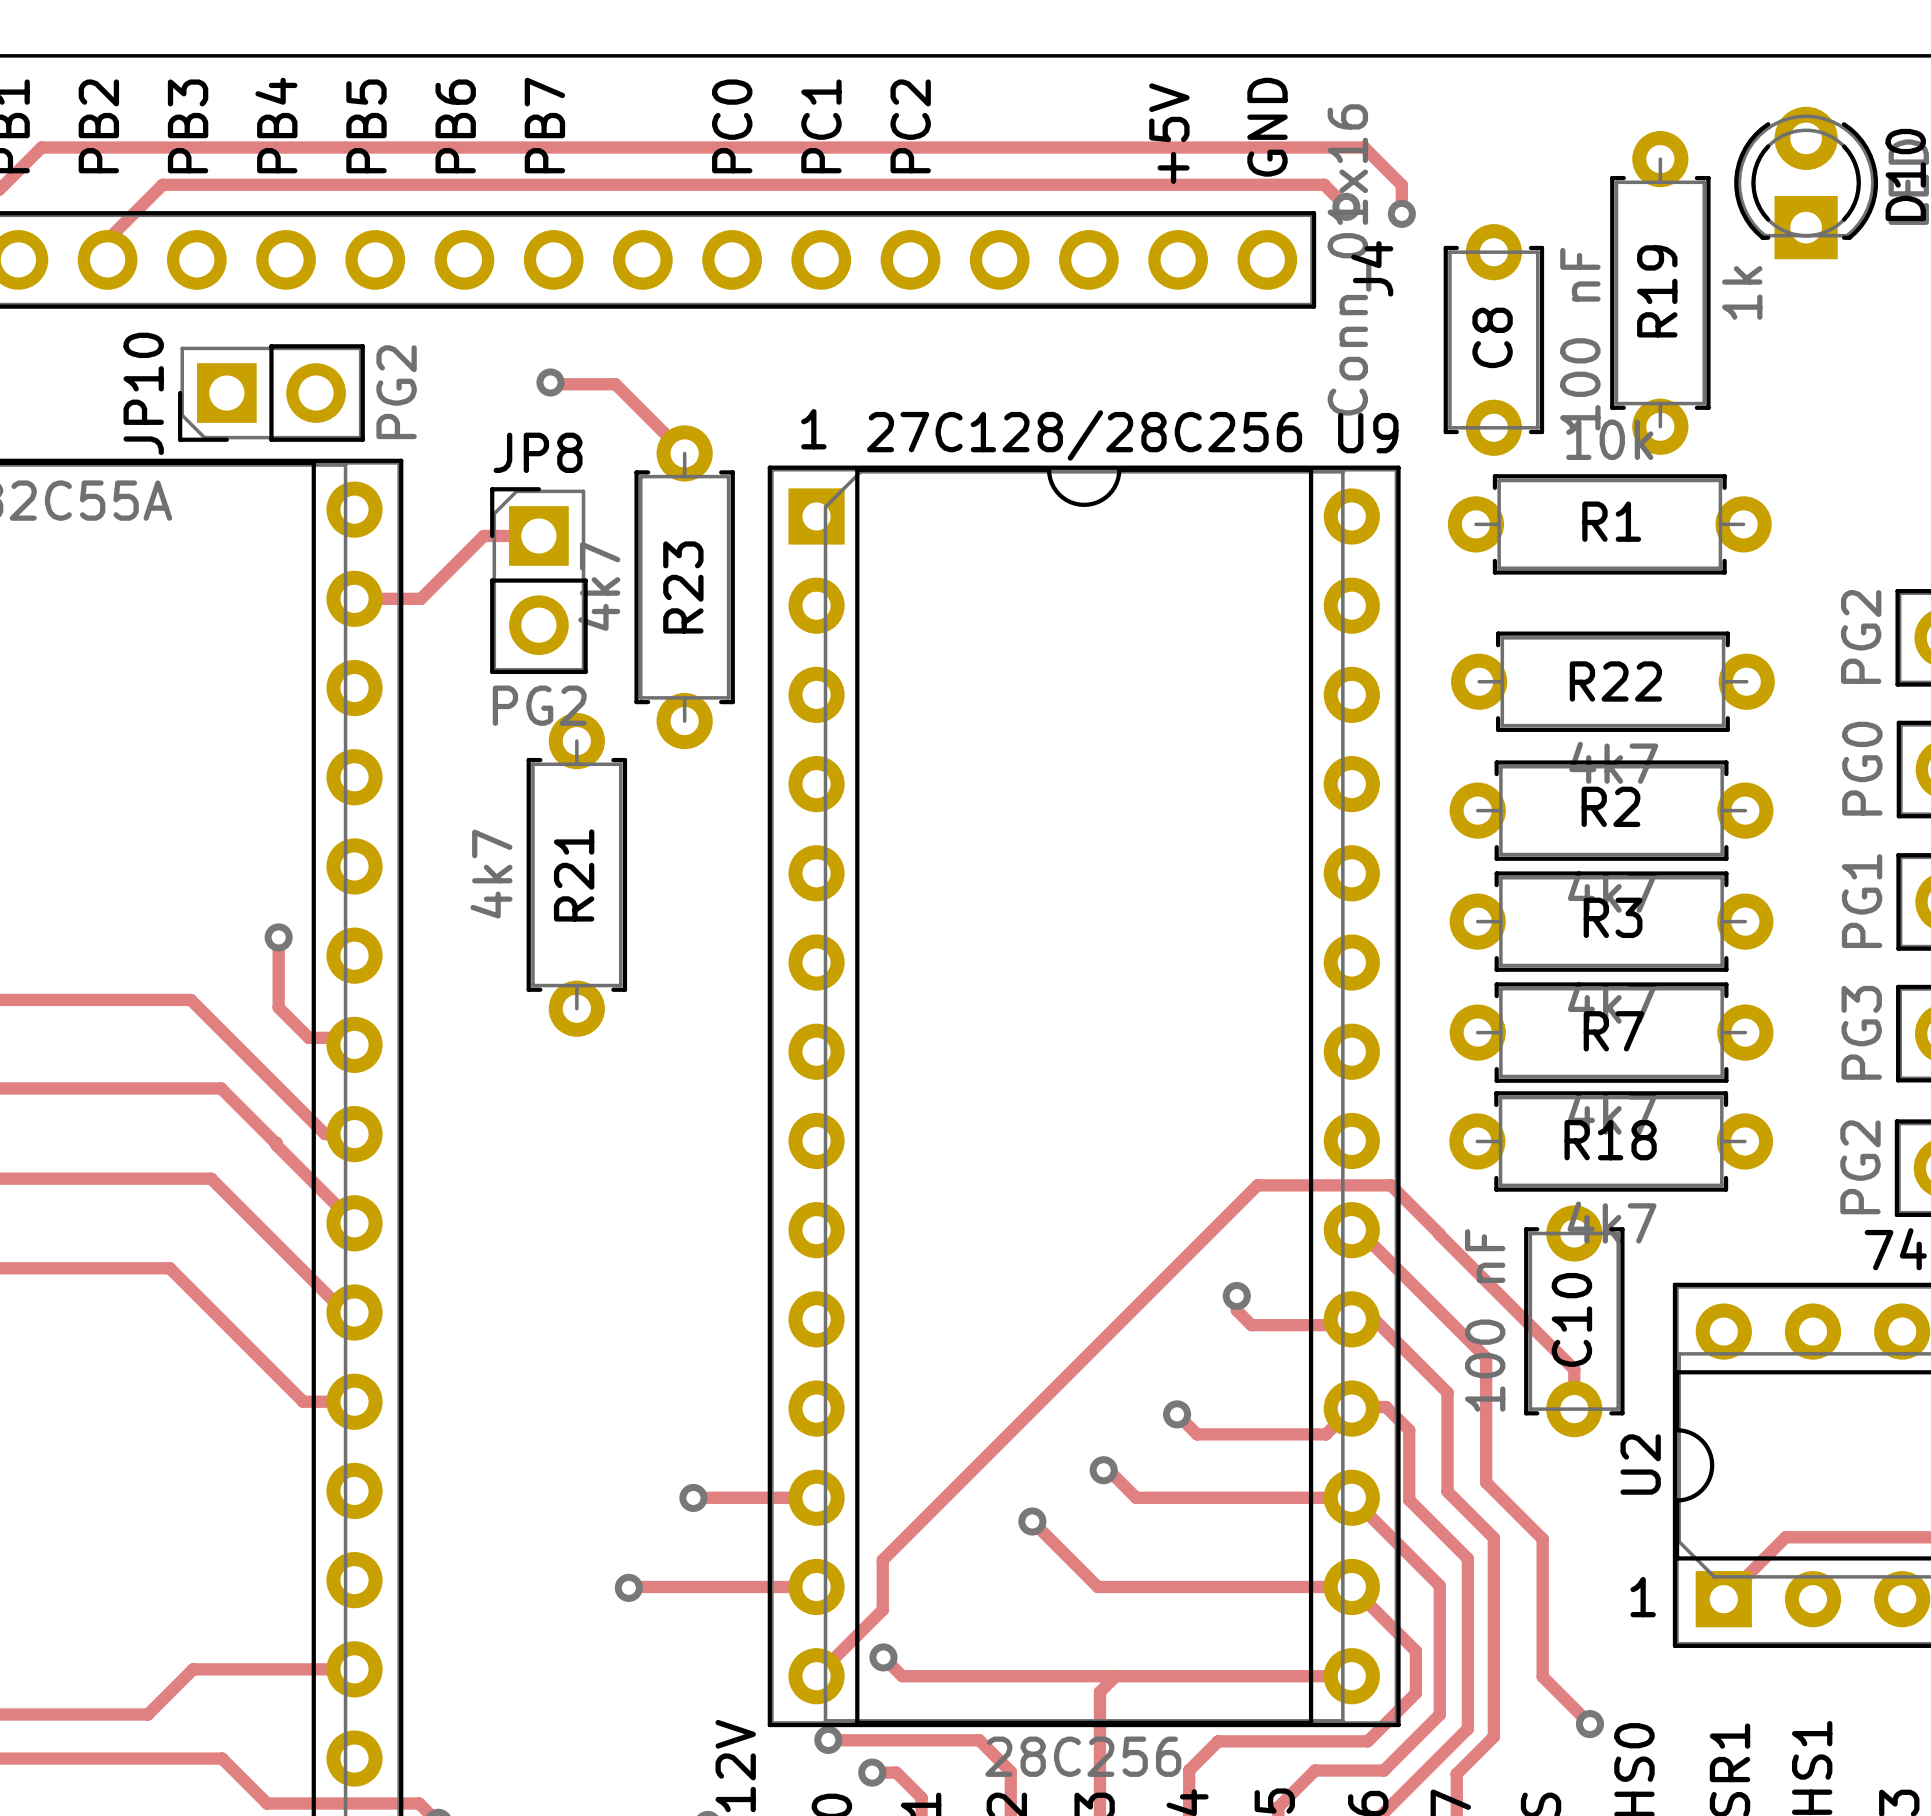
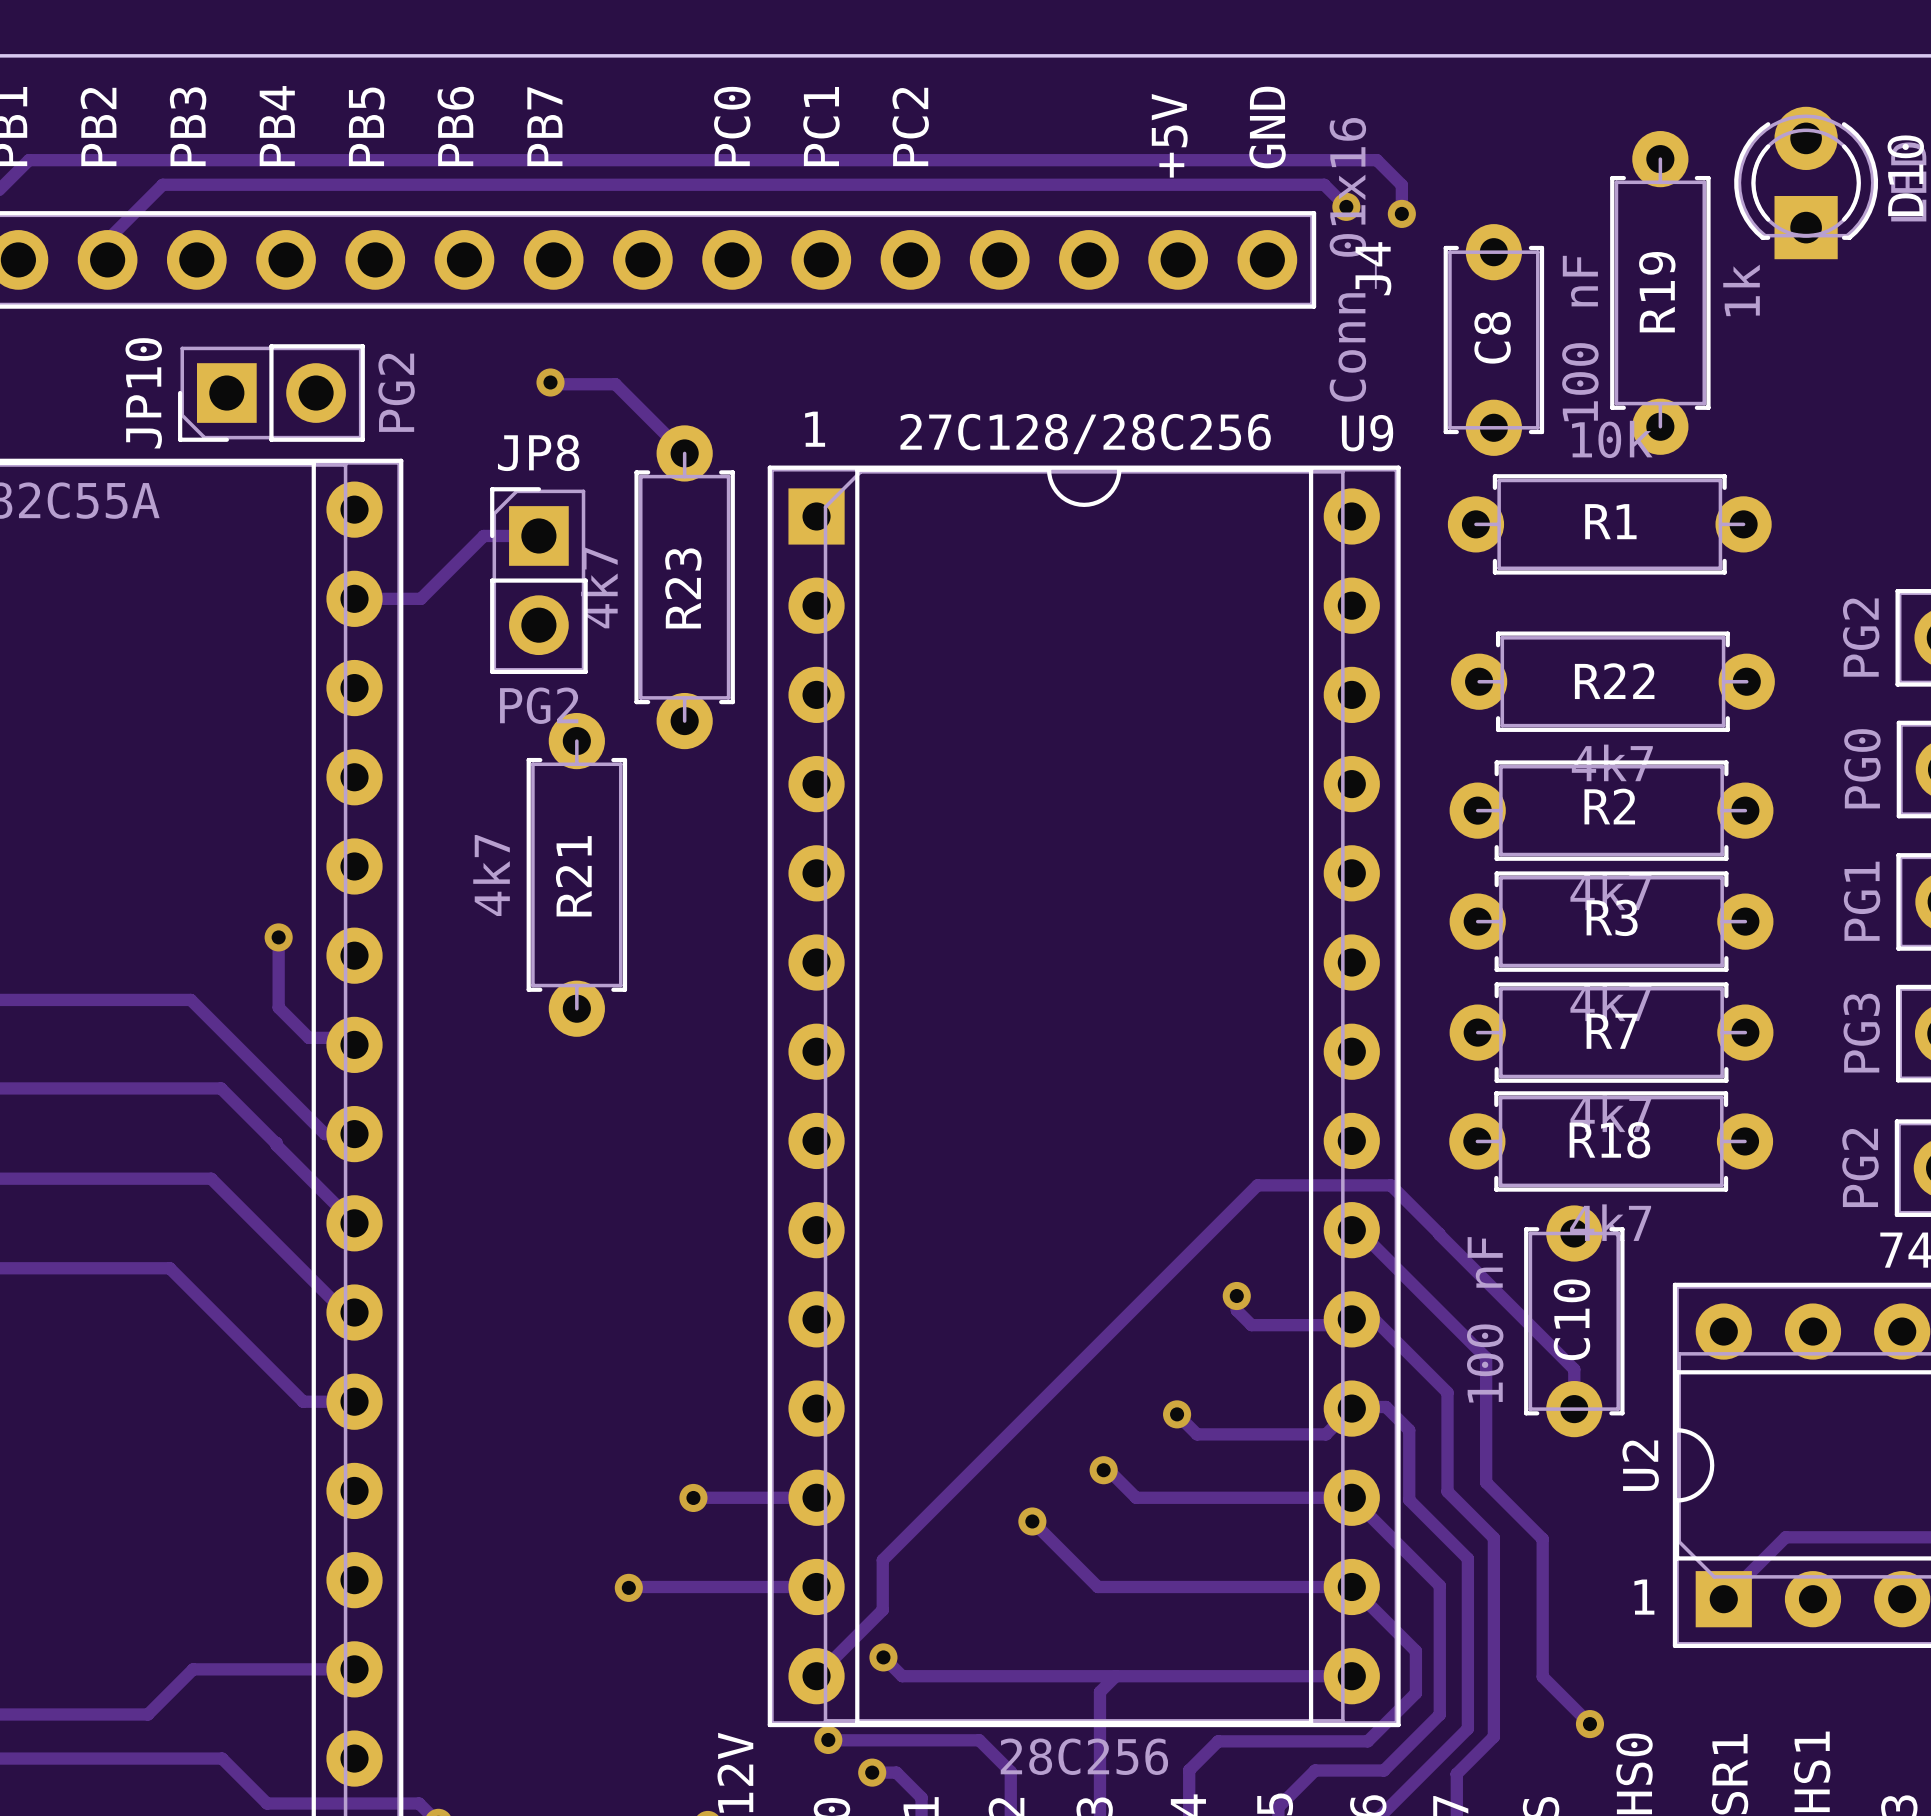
track: (28, 160) (41, 147) (1364, 147) (1376, 160) -> (28, 160) (1376, 160)

